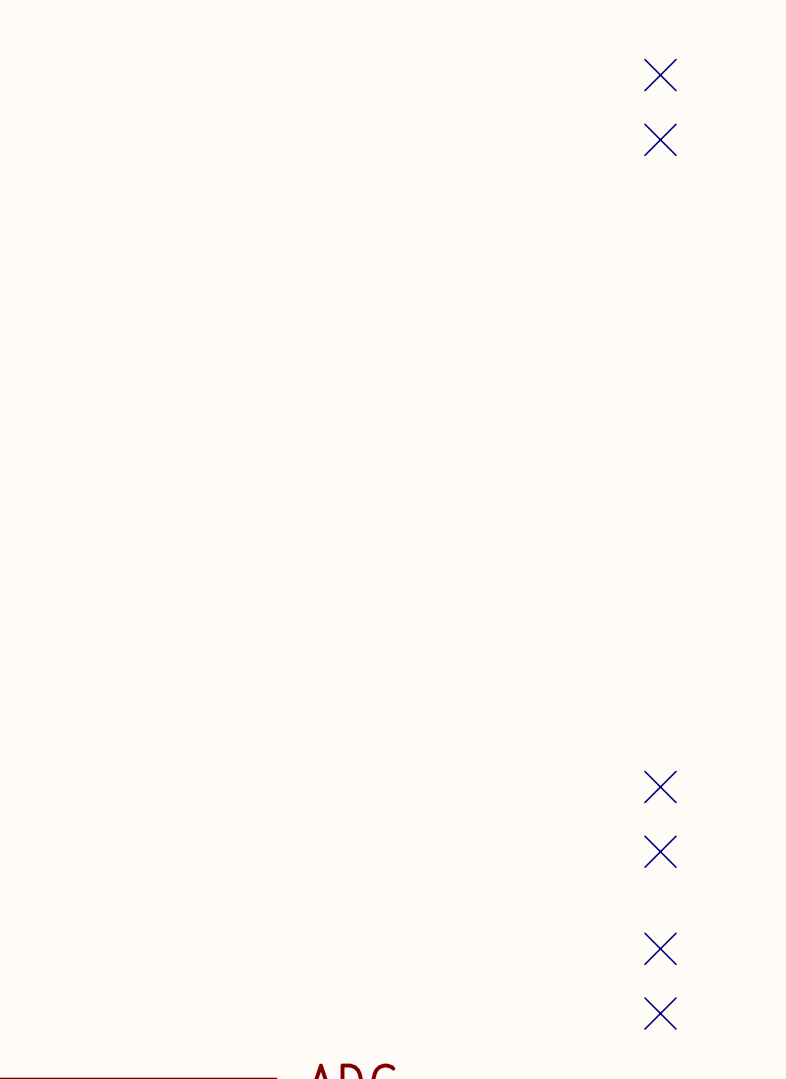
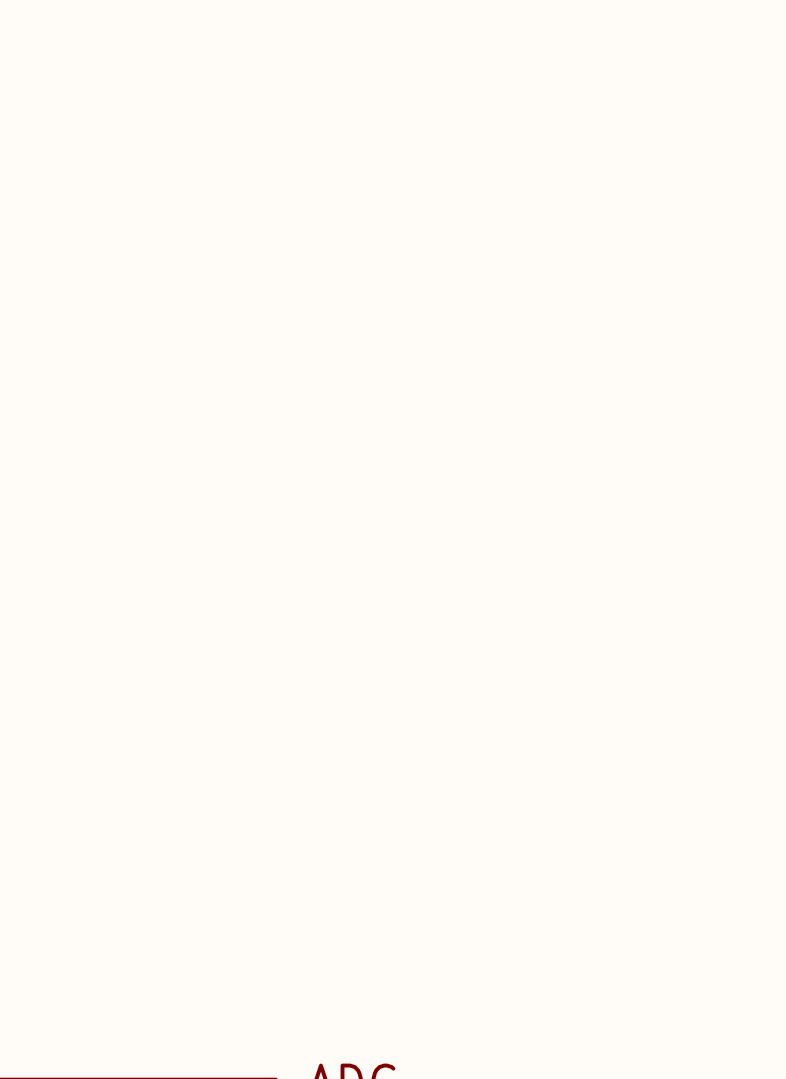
no-connect mark: (660, 75) -> none
no-connect mark: (660, 139) -> none
no-connect mark: (660, 787) -> none
no-connect mark: (660, 851) -> none
no-connect mark: (660, 948) -> none
no-connect mark: (660, 1013) -> none

